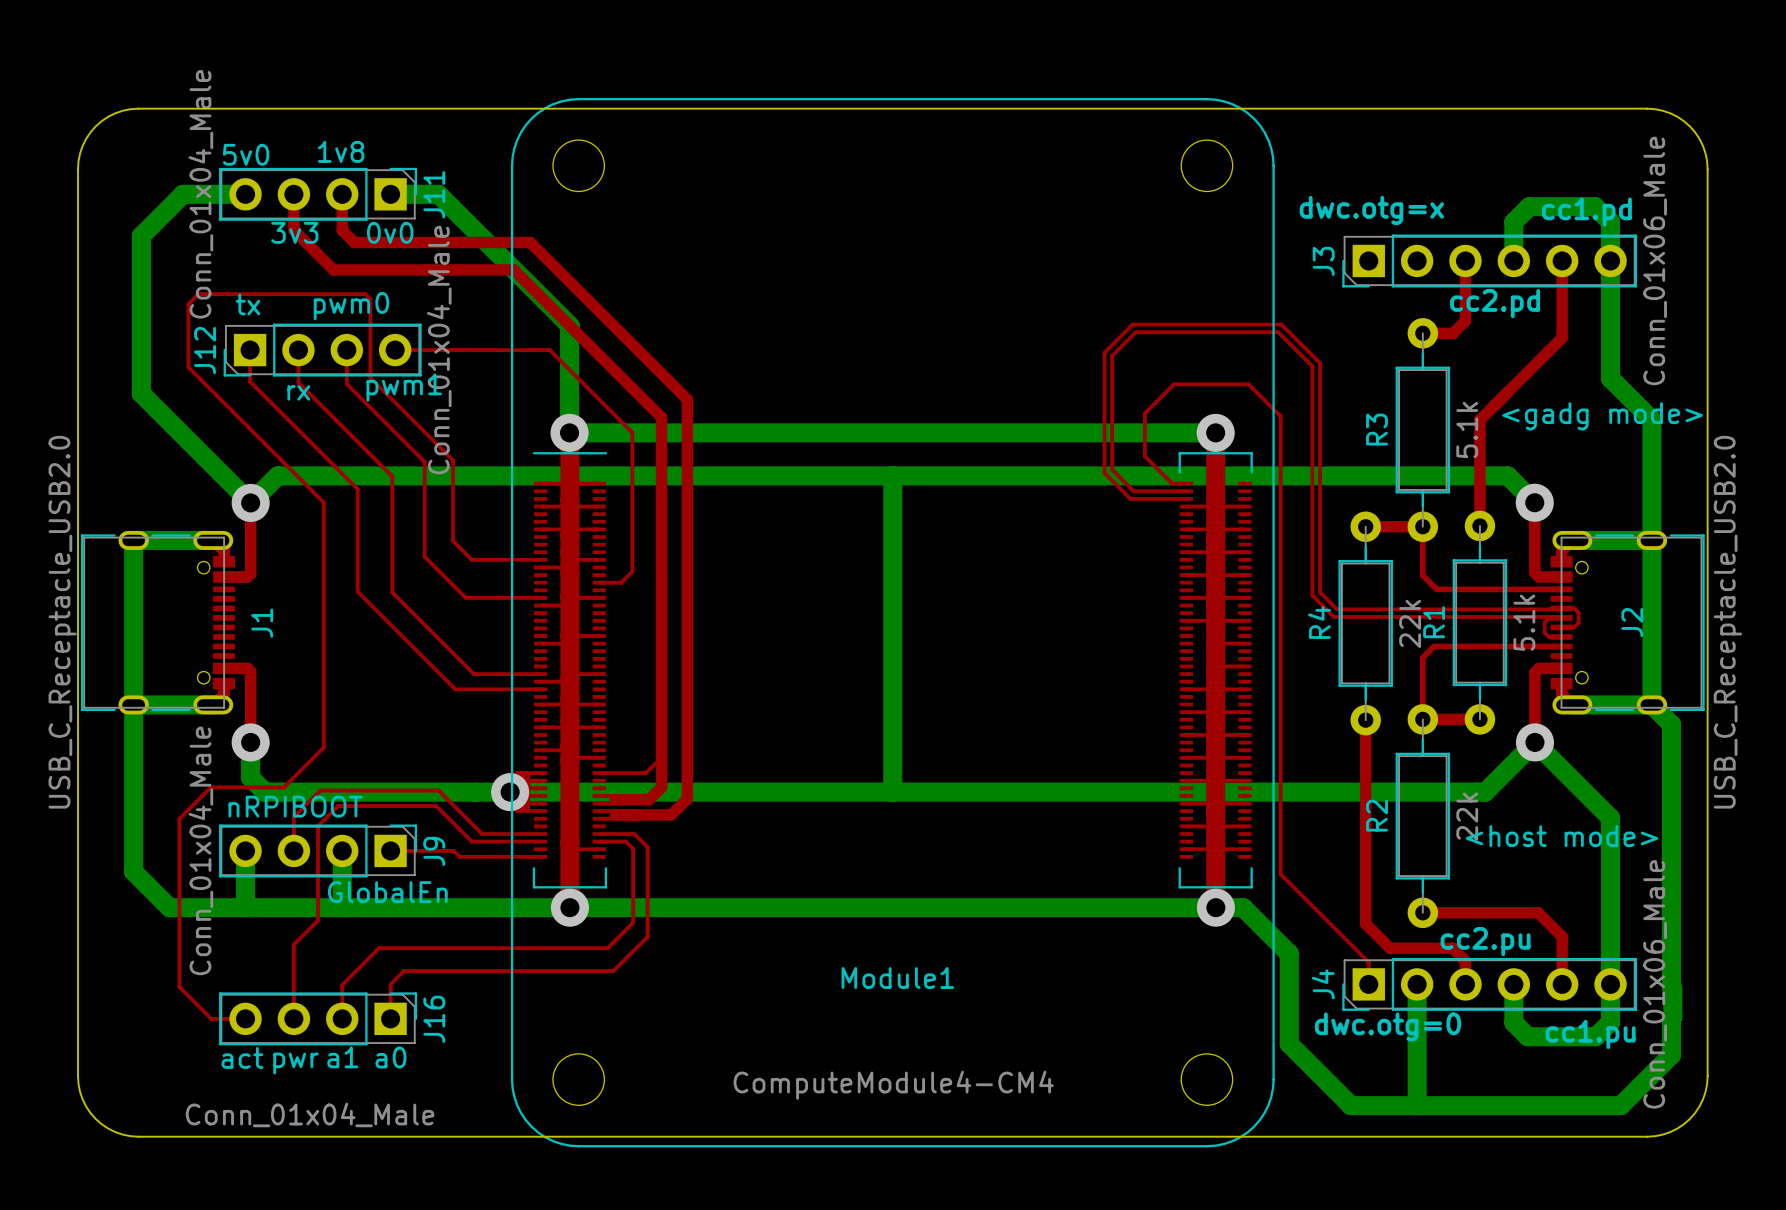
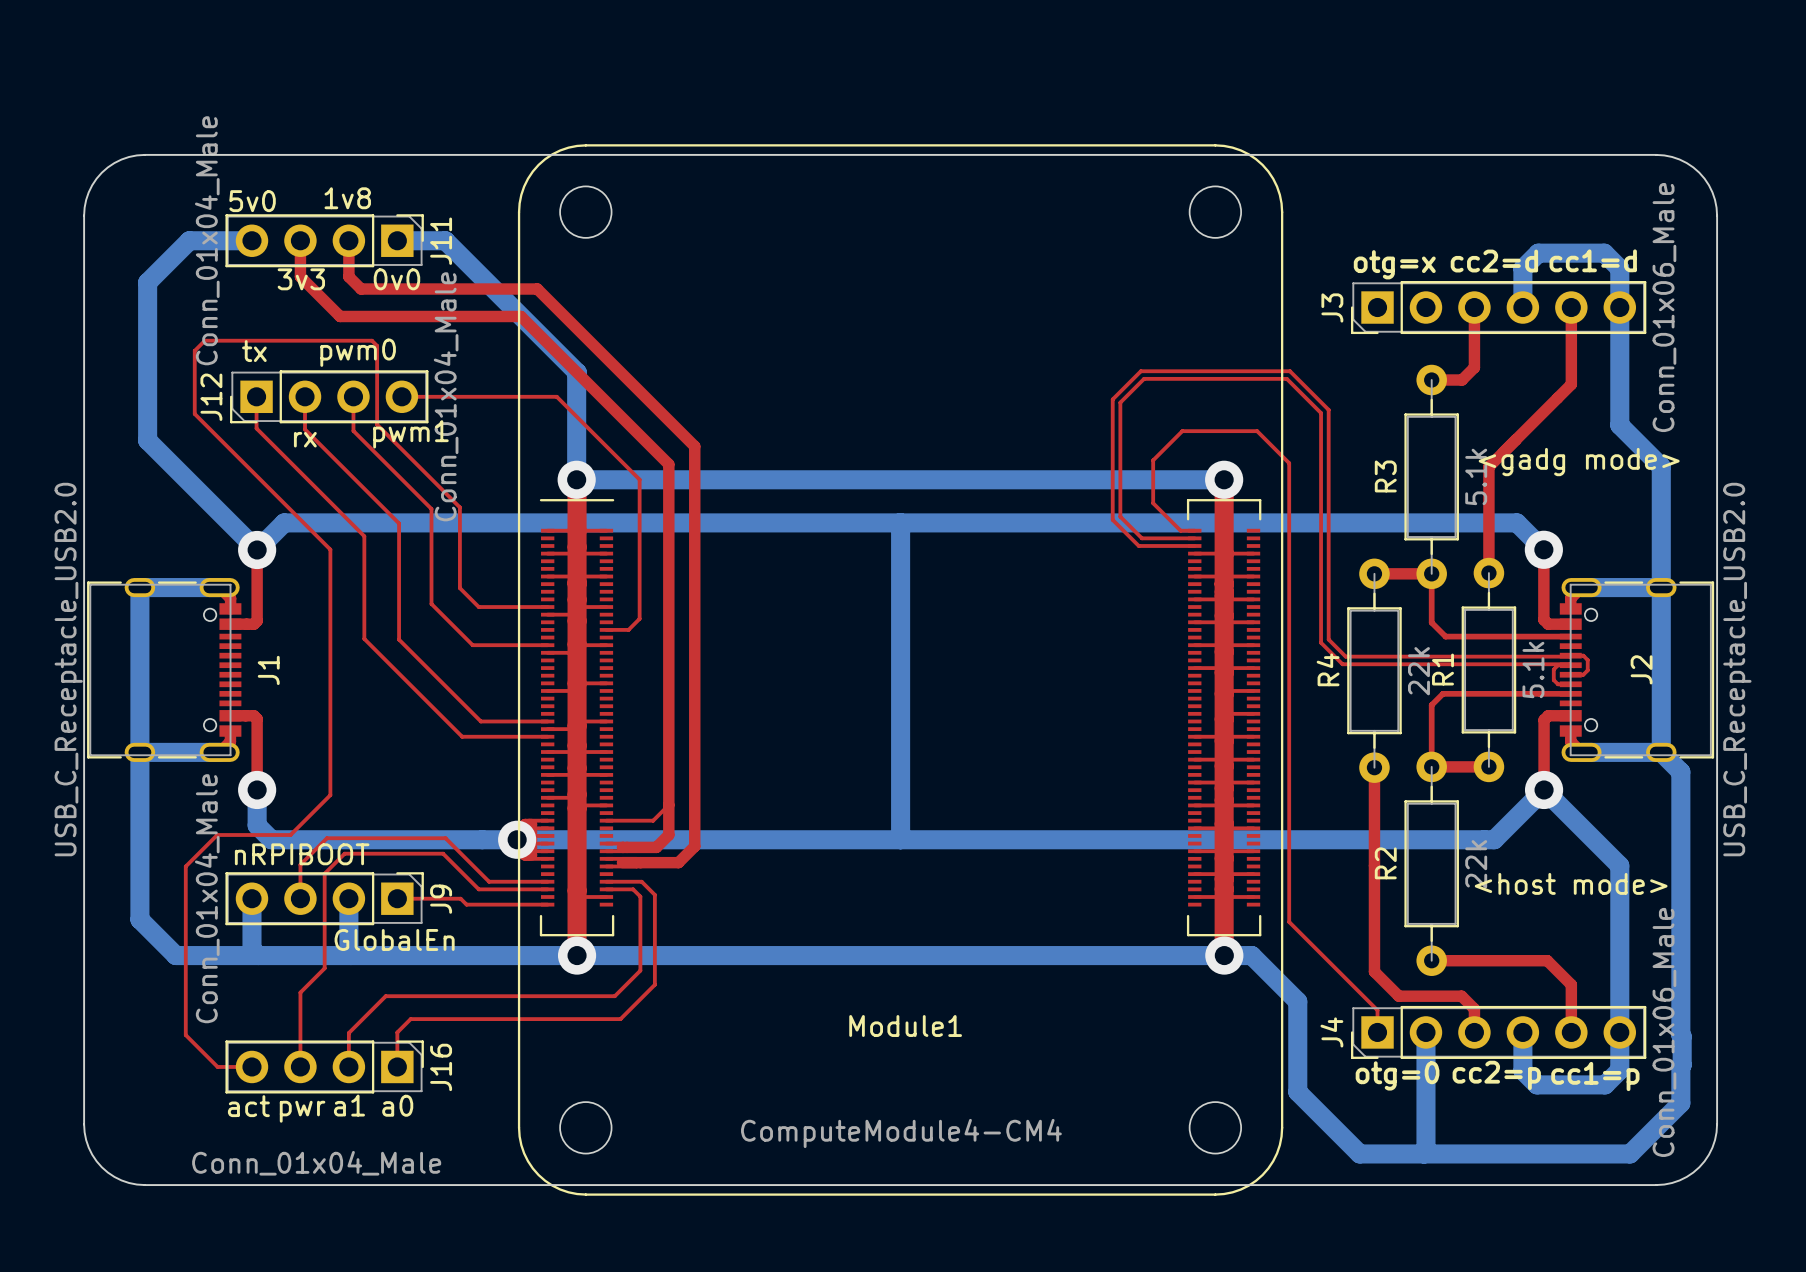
text: dwc.otg=x (1371, 210) -> otg=x (1394, 264)
text: cc1.pd (1586, 212) -> cc1=d (1593, 260)
text: none -> cc2=d (1494, 261)
text: cc2.pd (1495, 303) -> none
text position: <gadg mode> (1602, 416) -> <gadg mode> (1579, 462)
text: cc2.pu (1485, 941) -> none
text: dwc.otg=0 (1387, 1027) -> otg=0 (1397, 1075)
text: none -> cc2=p (1496, 1075)
text: cc1.pu (1590, 1034) -> cc1=p (1595, 1076)

